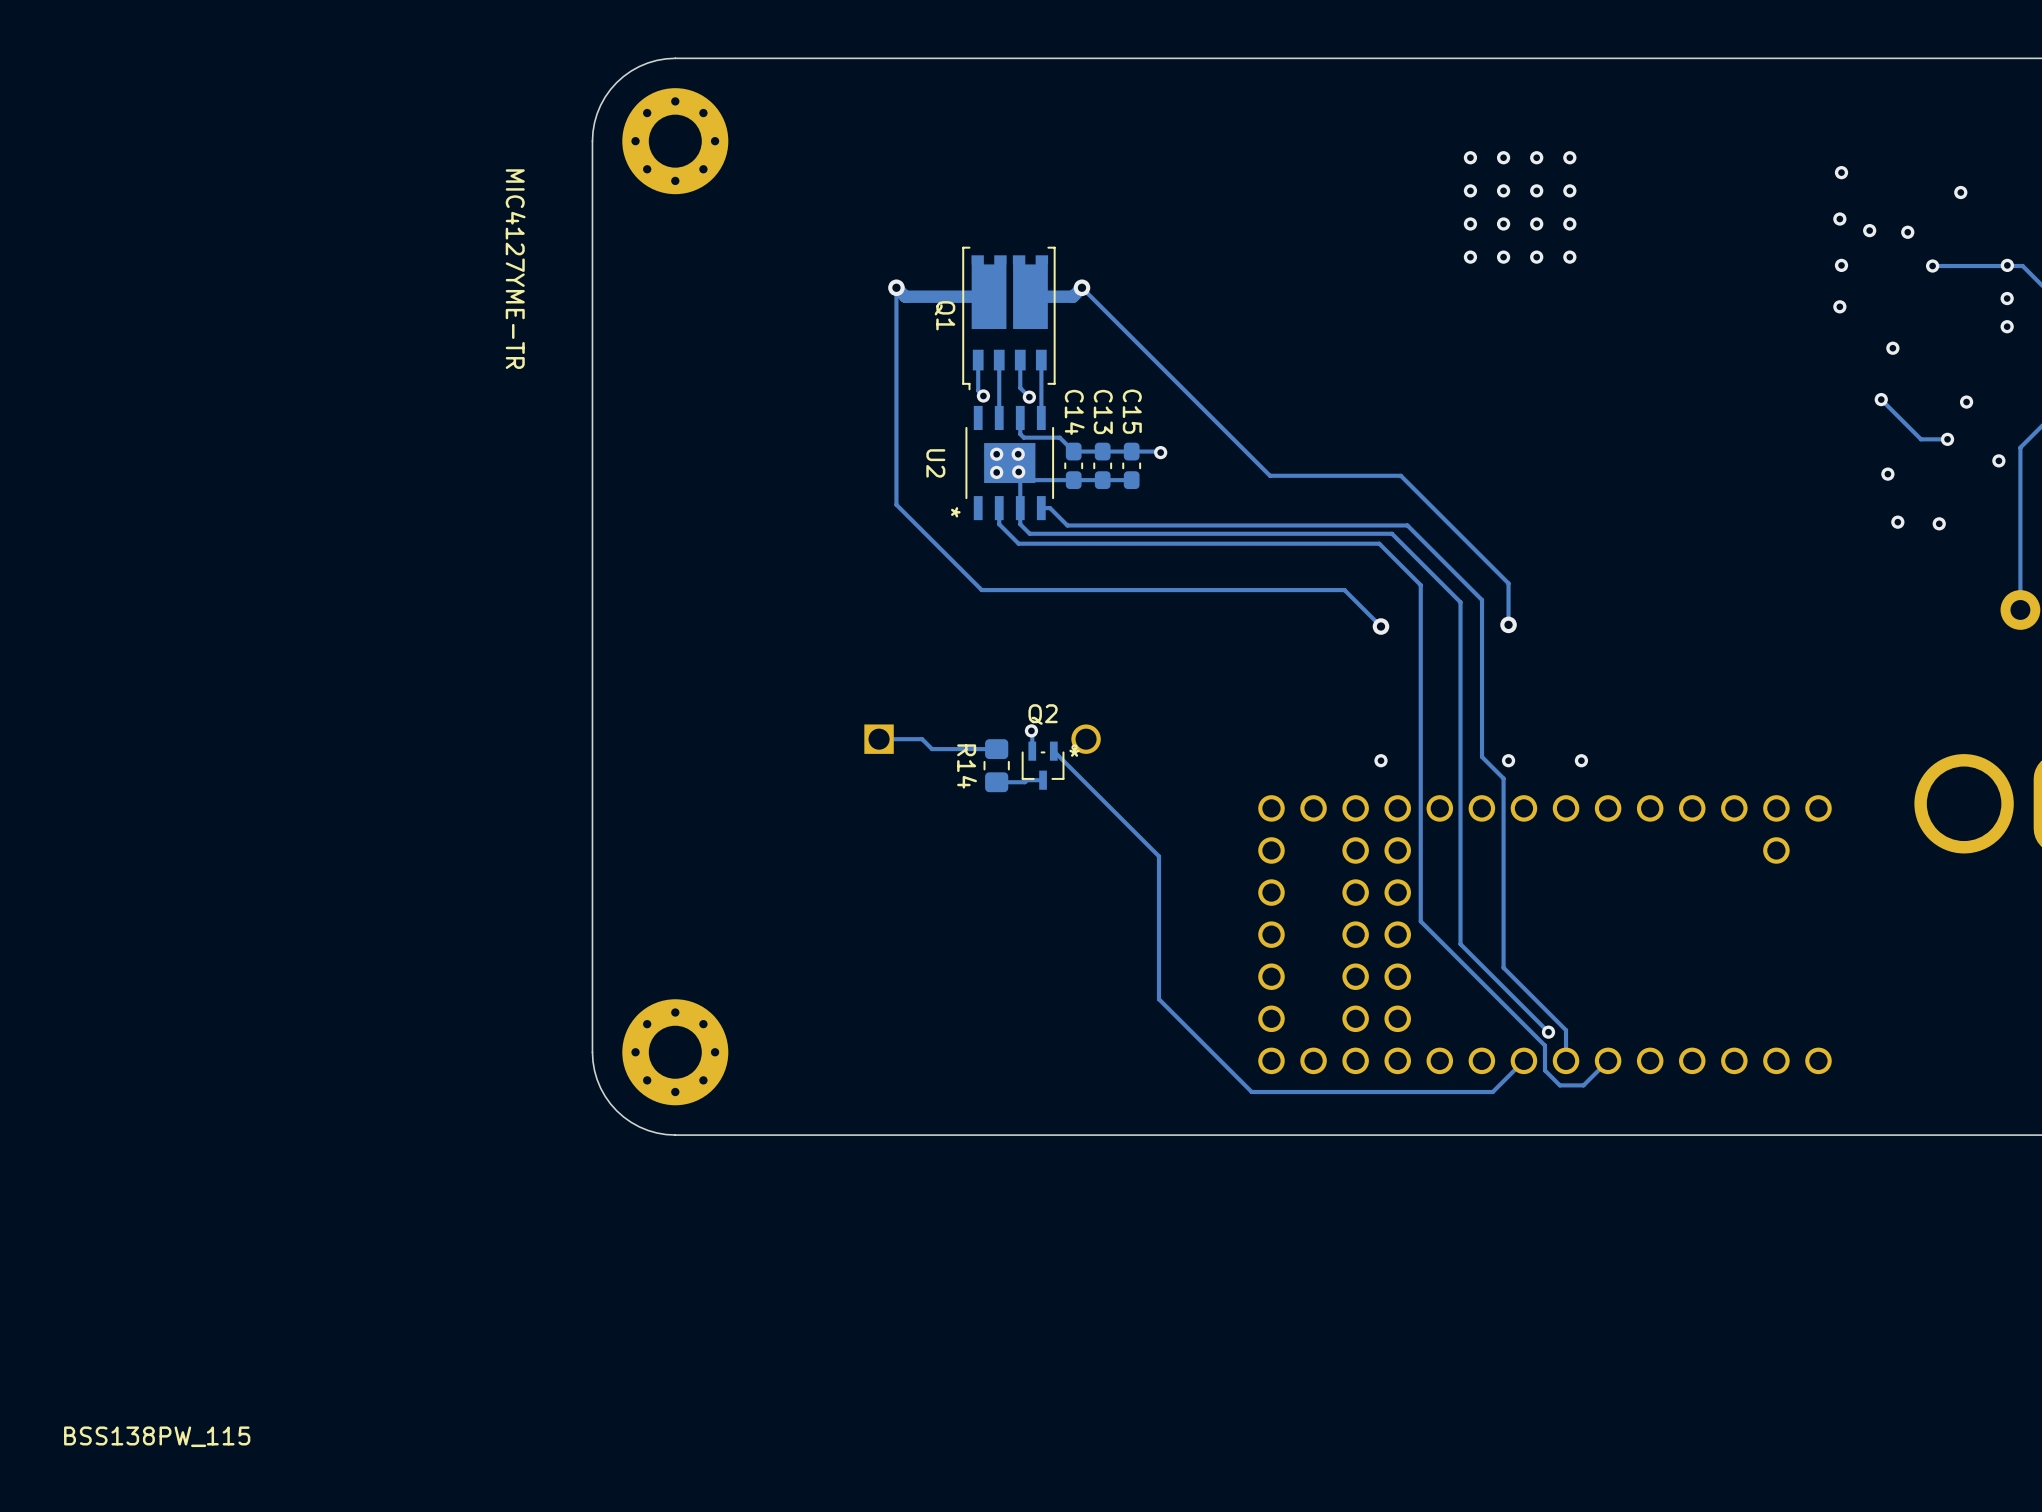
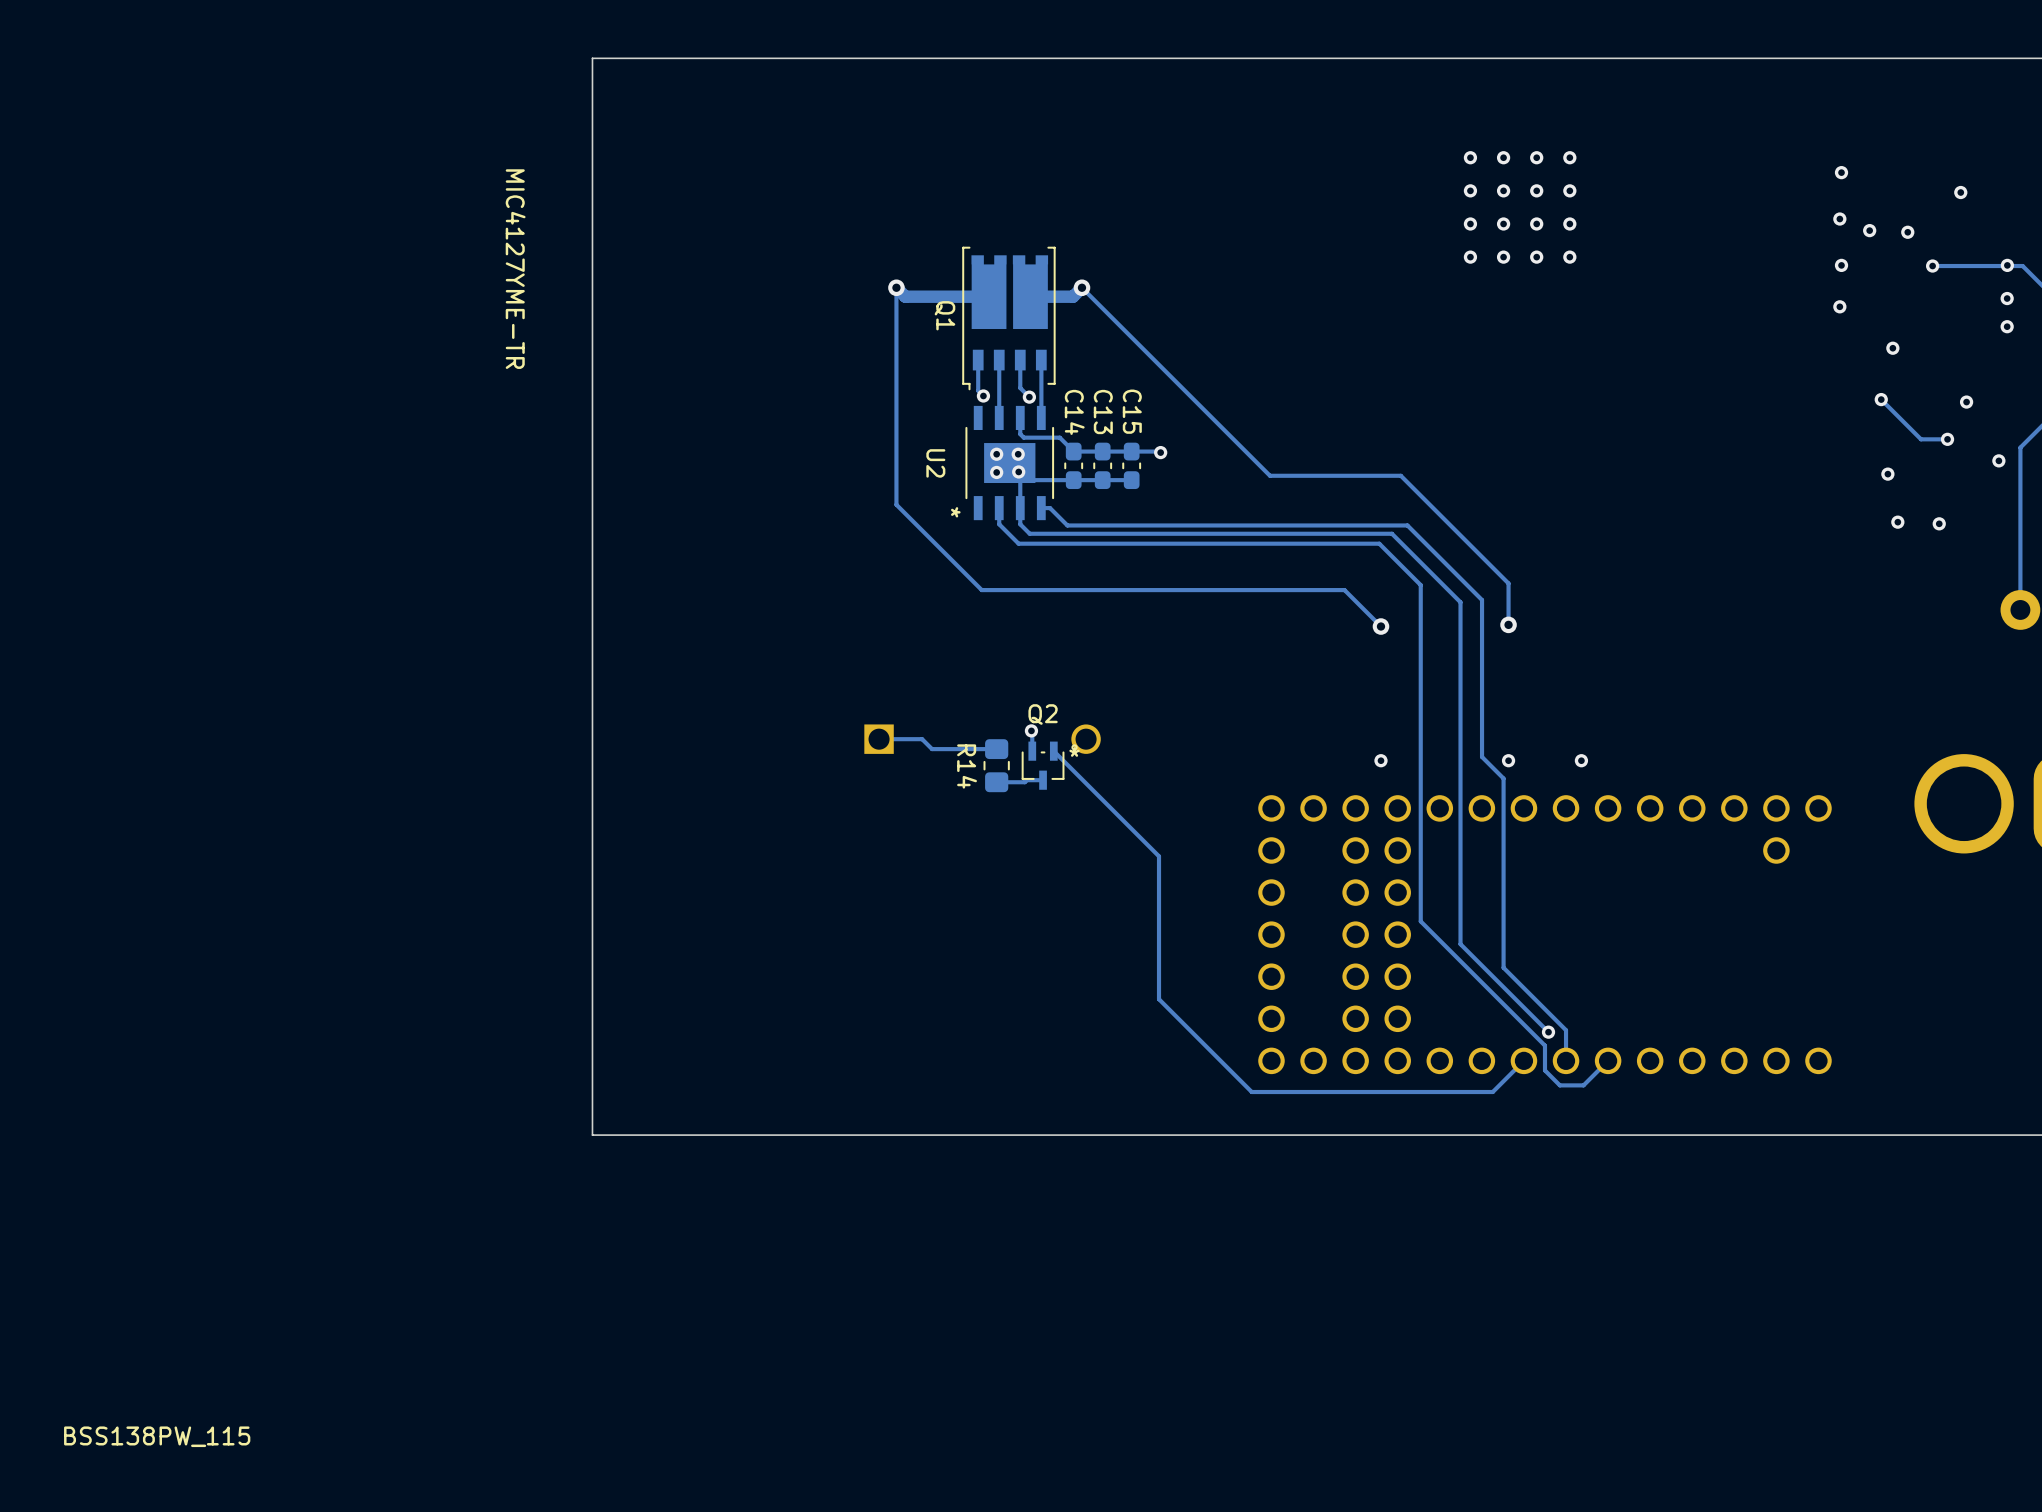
board edge: (675, 58) (647, 62) (631, 71) (616, 82) (605, 97) (597, 113) (592, 141) -> (675, 58) (592, 58) (592, 141)
part: (675, 141) -> none
board edge: (592, 1052) (597, 1079) (605, 1096) (616, 1110) (631, 1122) (647, 1130) (675, 1135) -> (592, 1052) (592, 1135) (675, 1135)
part: (675, 1052) -> none

